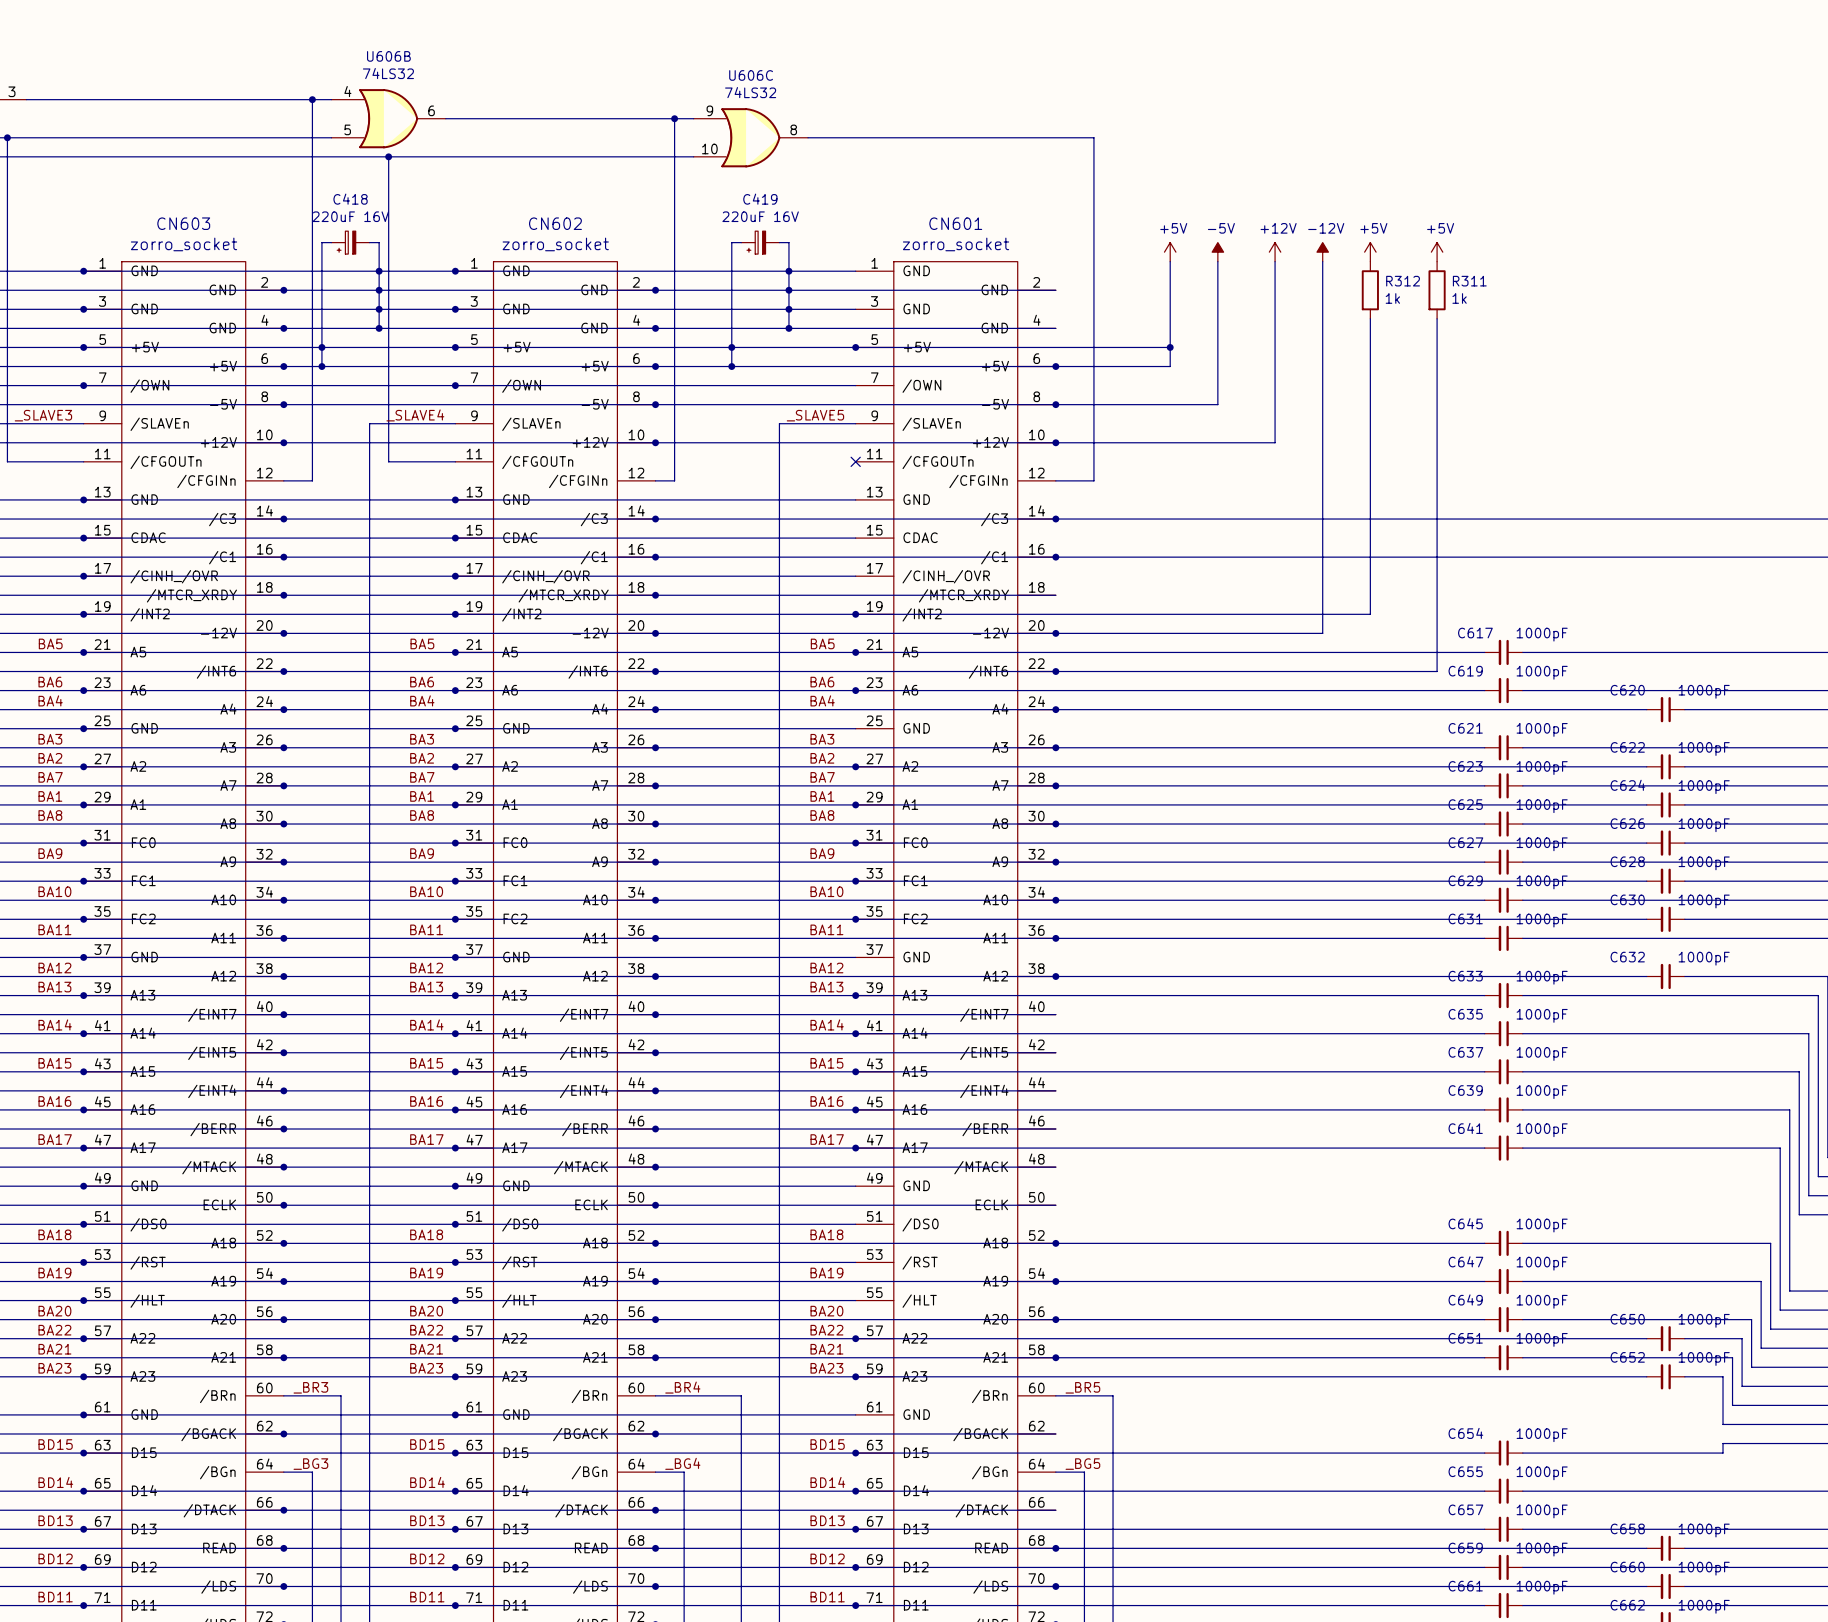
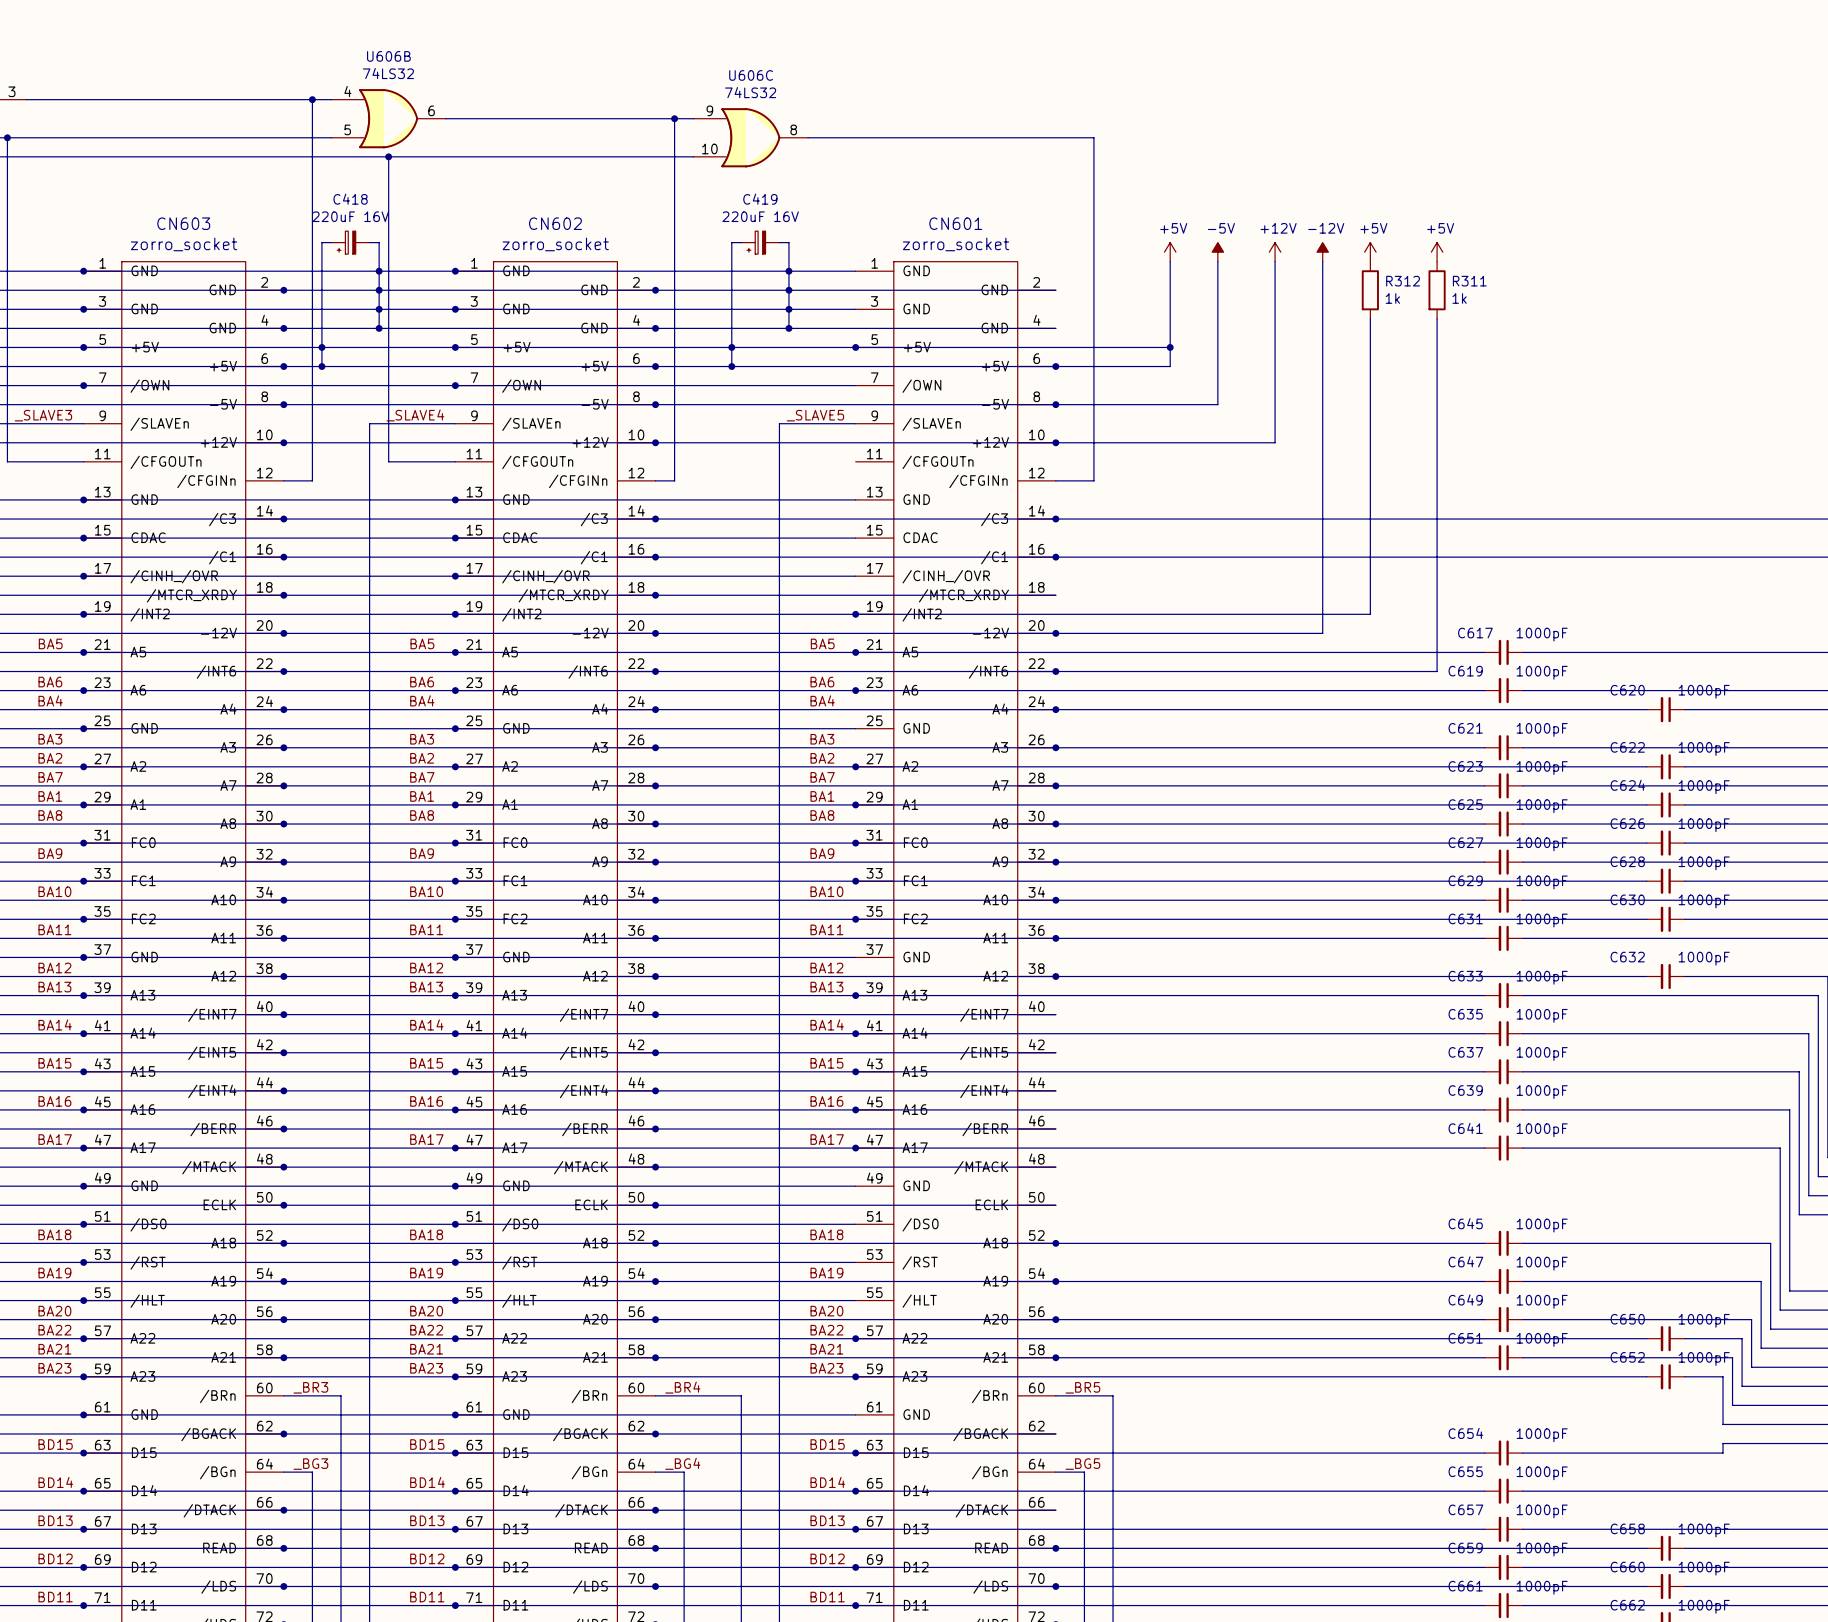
no-connect mark: (855, 461) -> none

